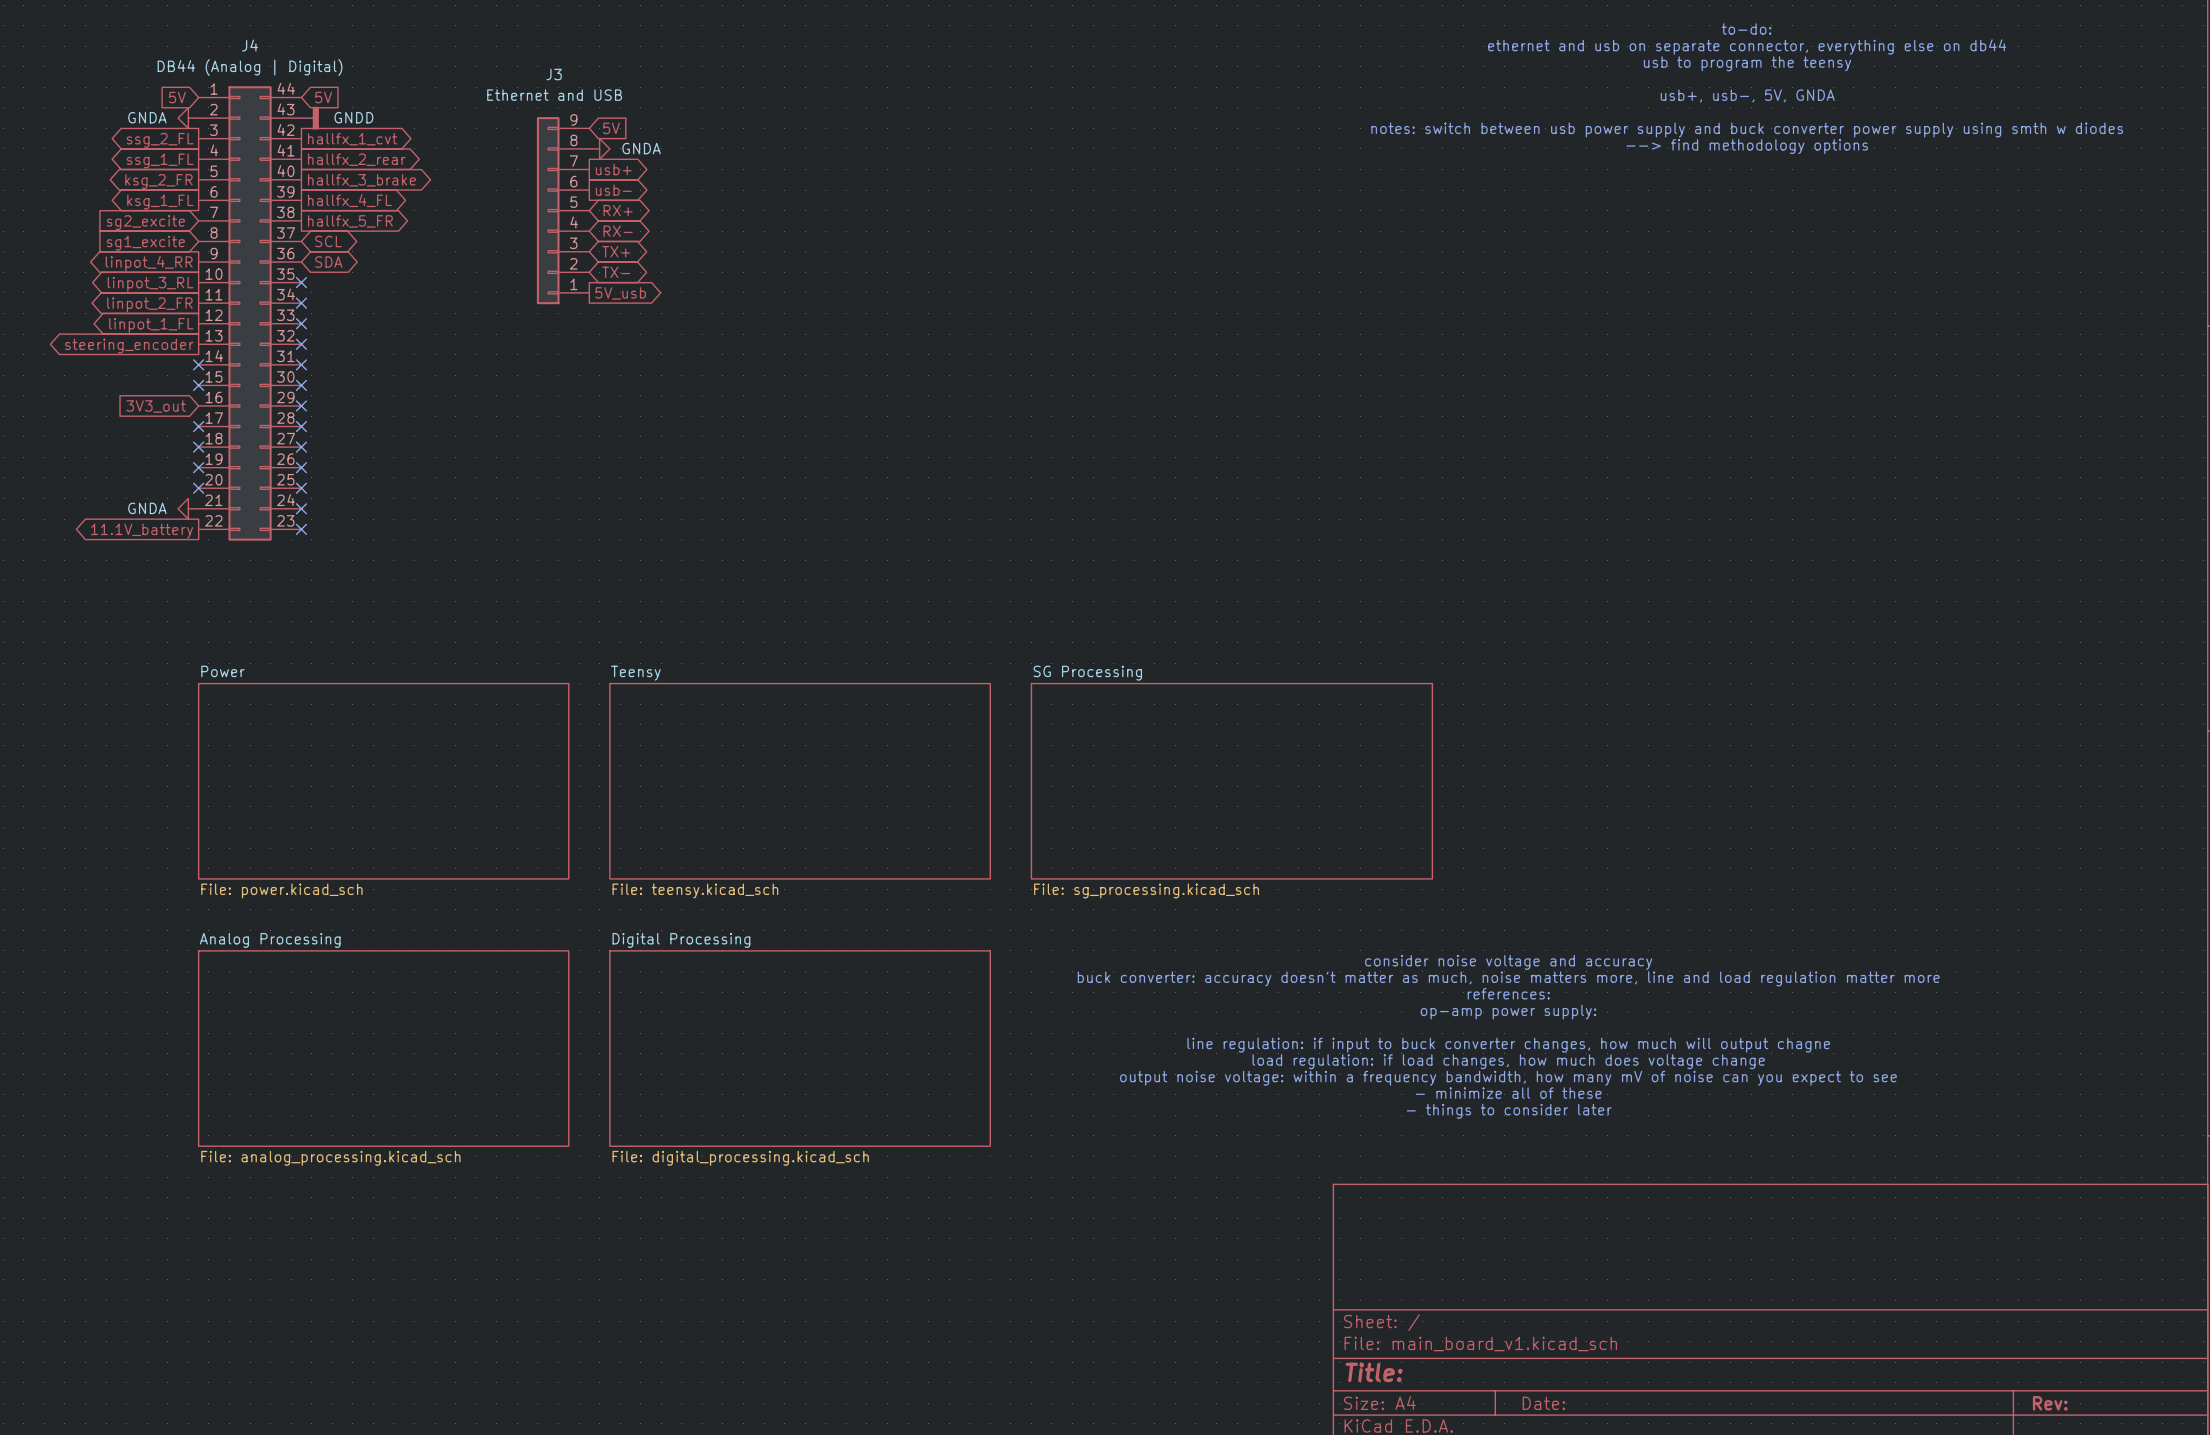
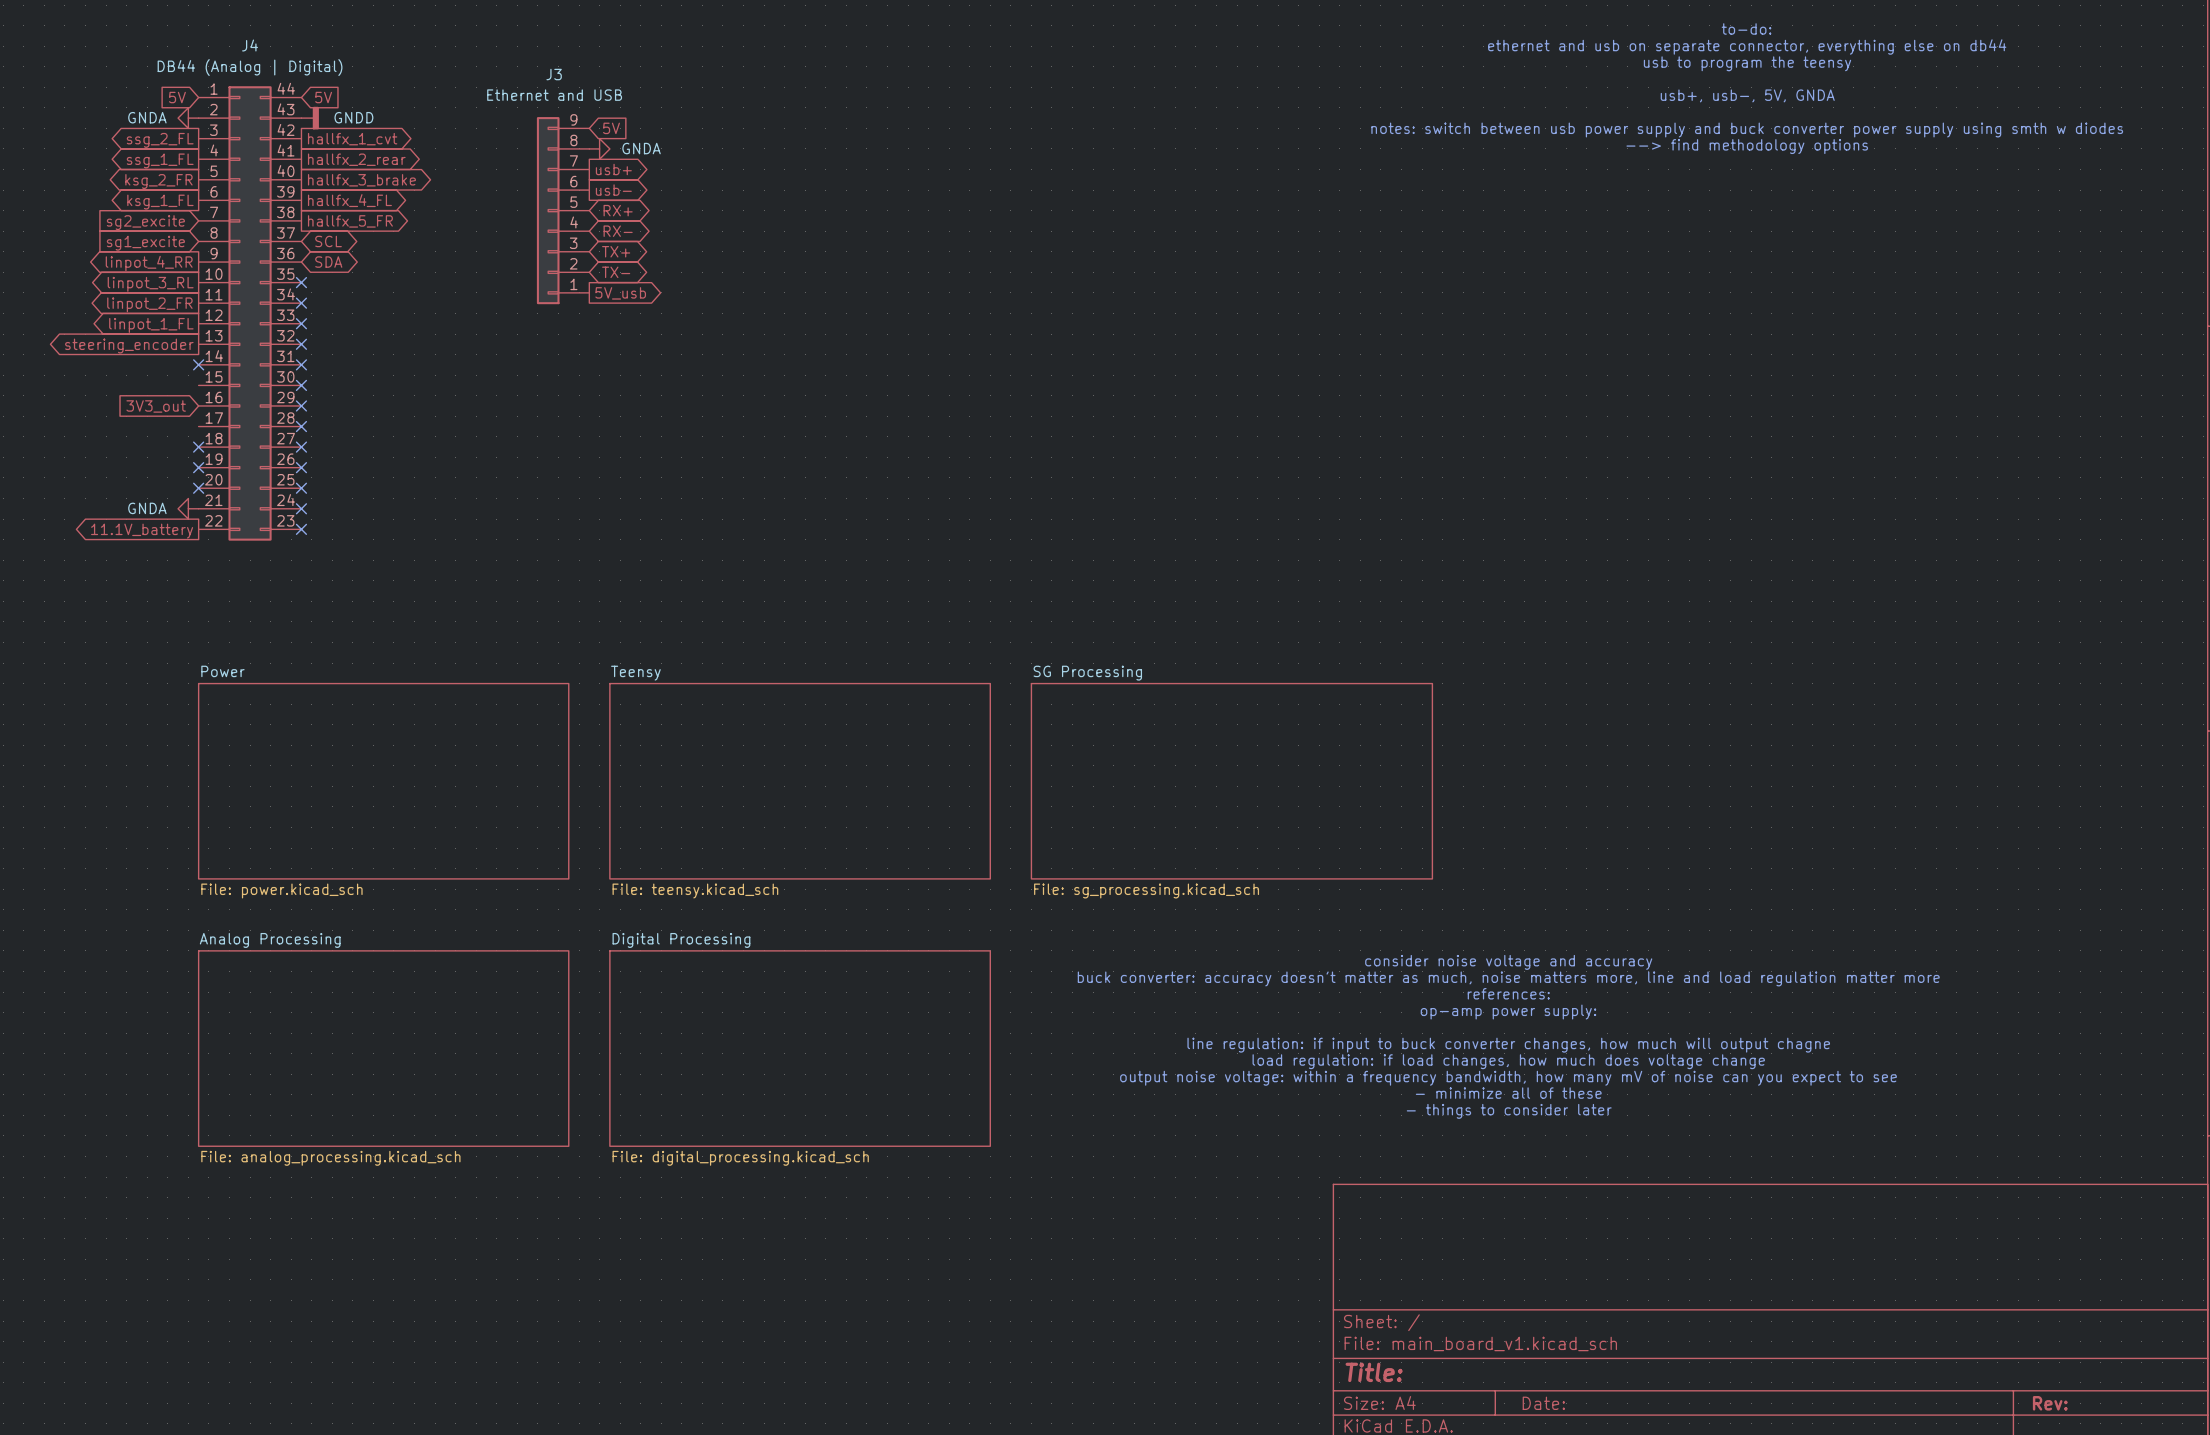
no-connect mark: (198, 385) -> none
no-connect mark: (198, 426) -> none

